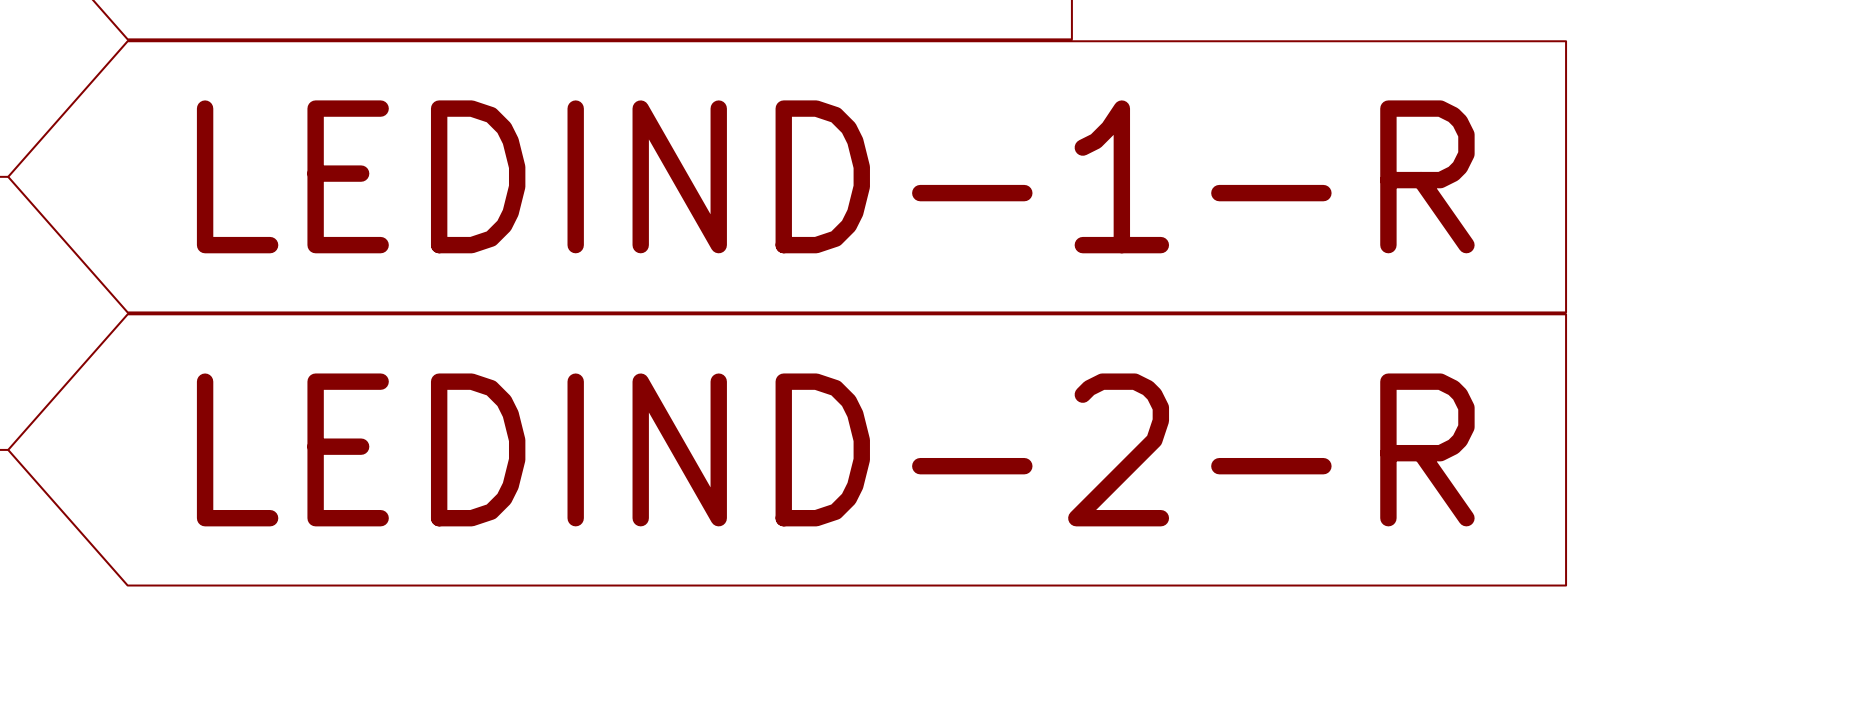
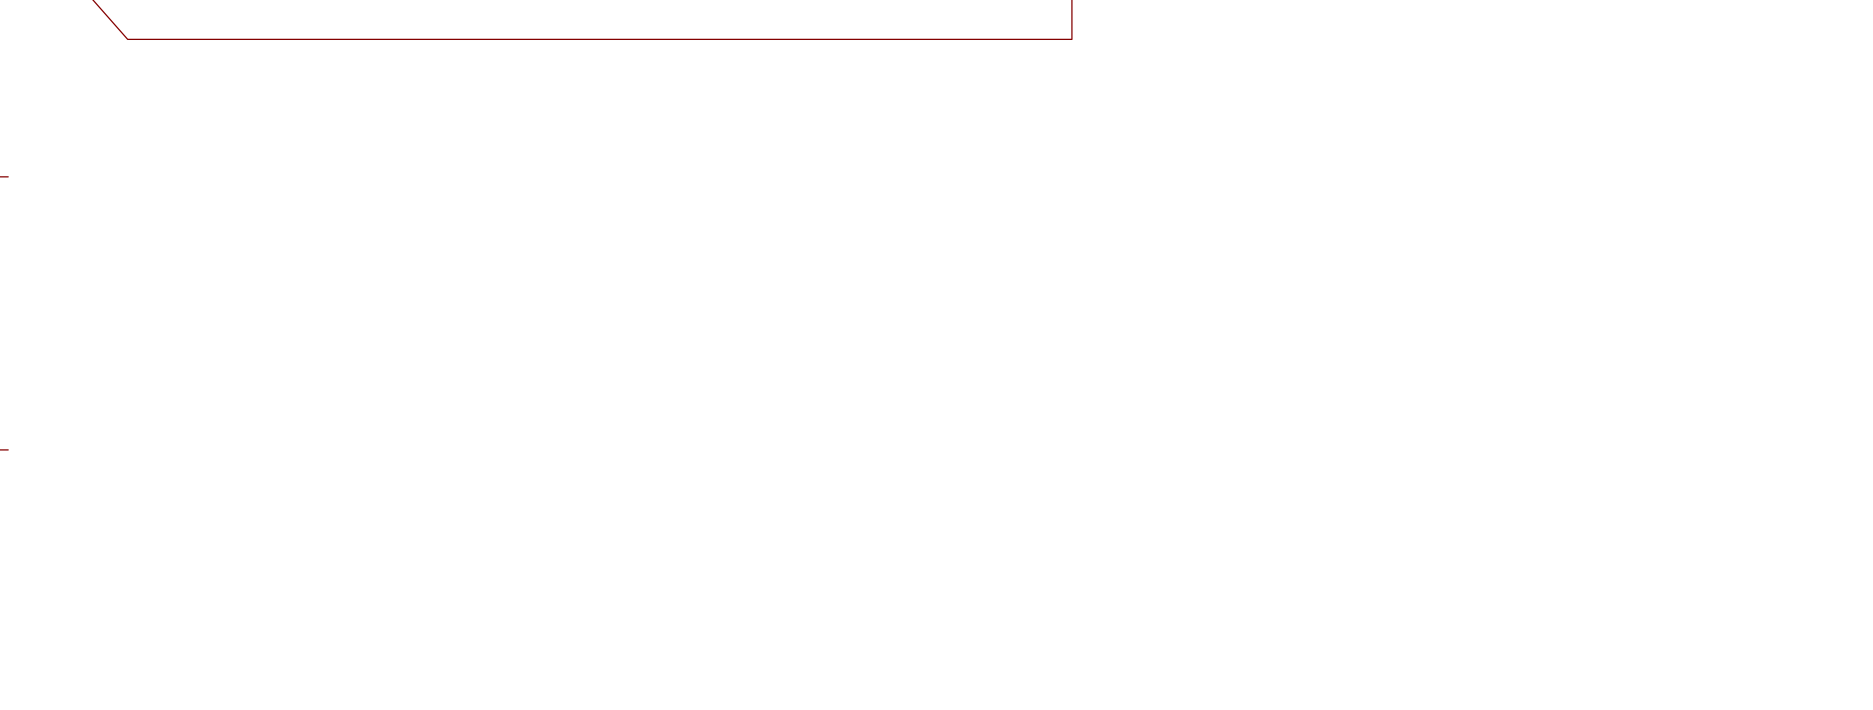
global label: LEDIND-1-R (835, 176) -> none
global label: LEDIND-2-R (835, 449) -> none

